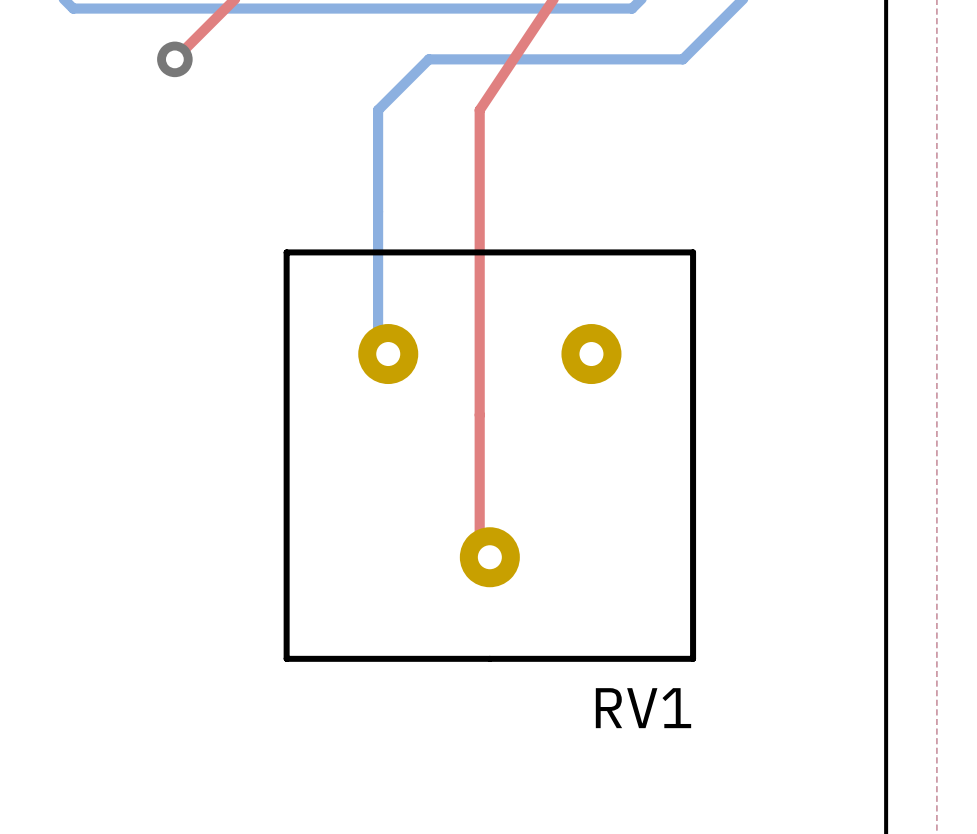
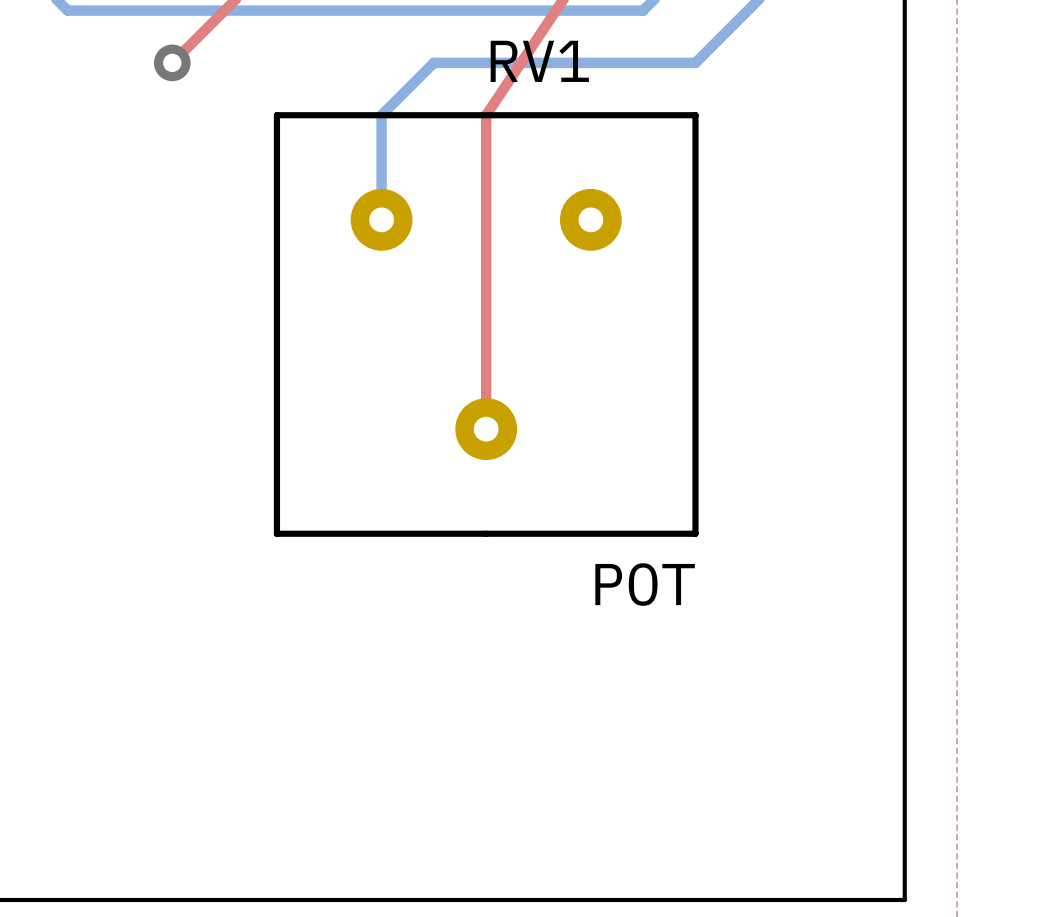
bottom track: (378, 211) (378, 343) (388, 354) -> none
top track: (479, 414) (479, 547) (489, 557) -> none
RV1 position: (489, 455) -> (486, 324)
RV1 value: none -> POT (645, 584)
RV1 name position: RV1 (643, 708) -> RV1 (539, 61)

